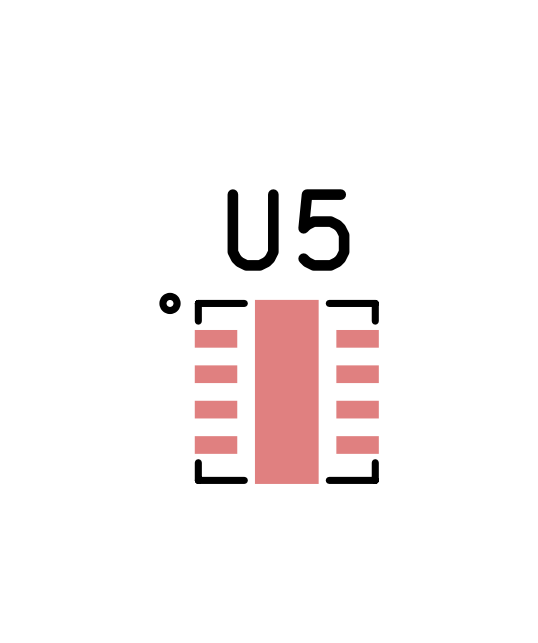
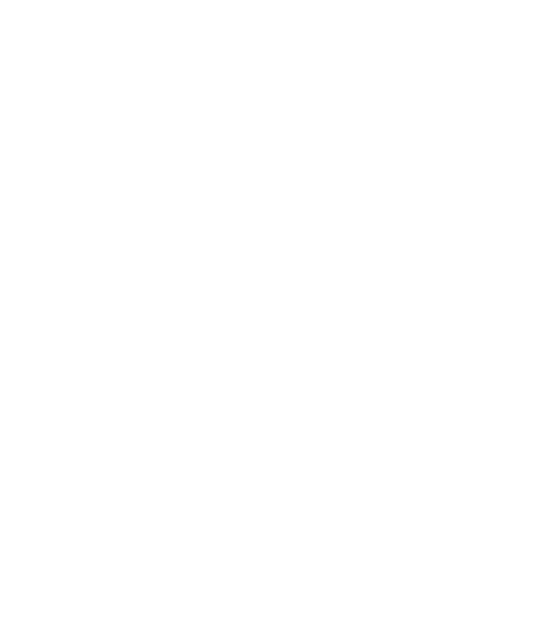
U5: (269, 388) -> none

